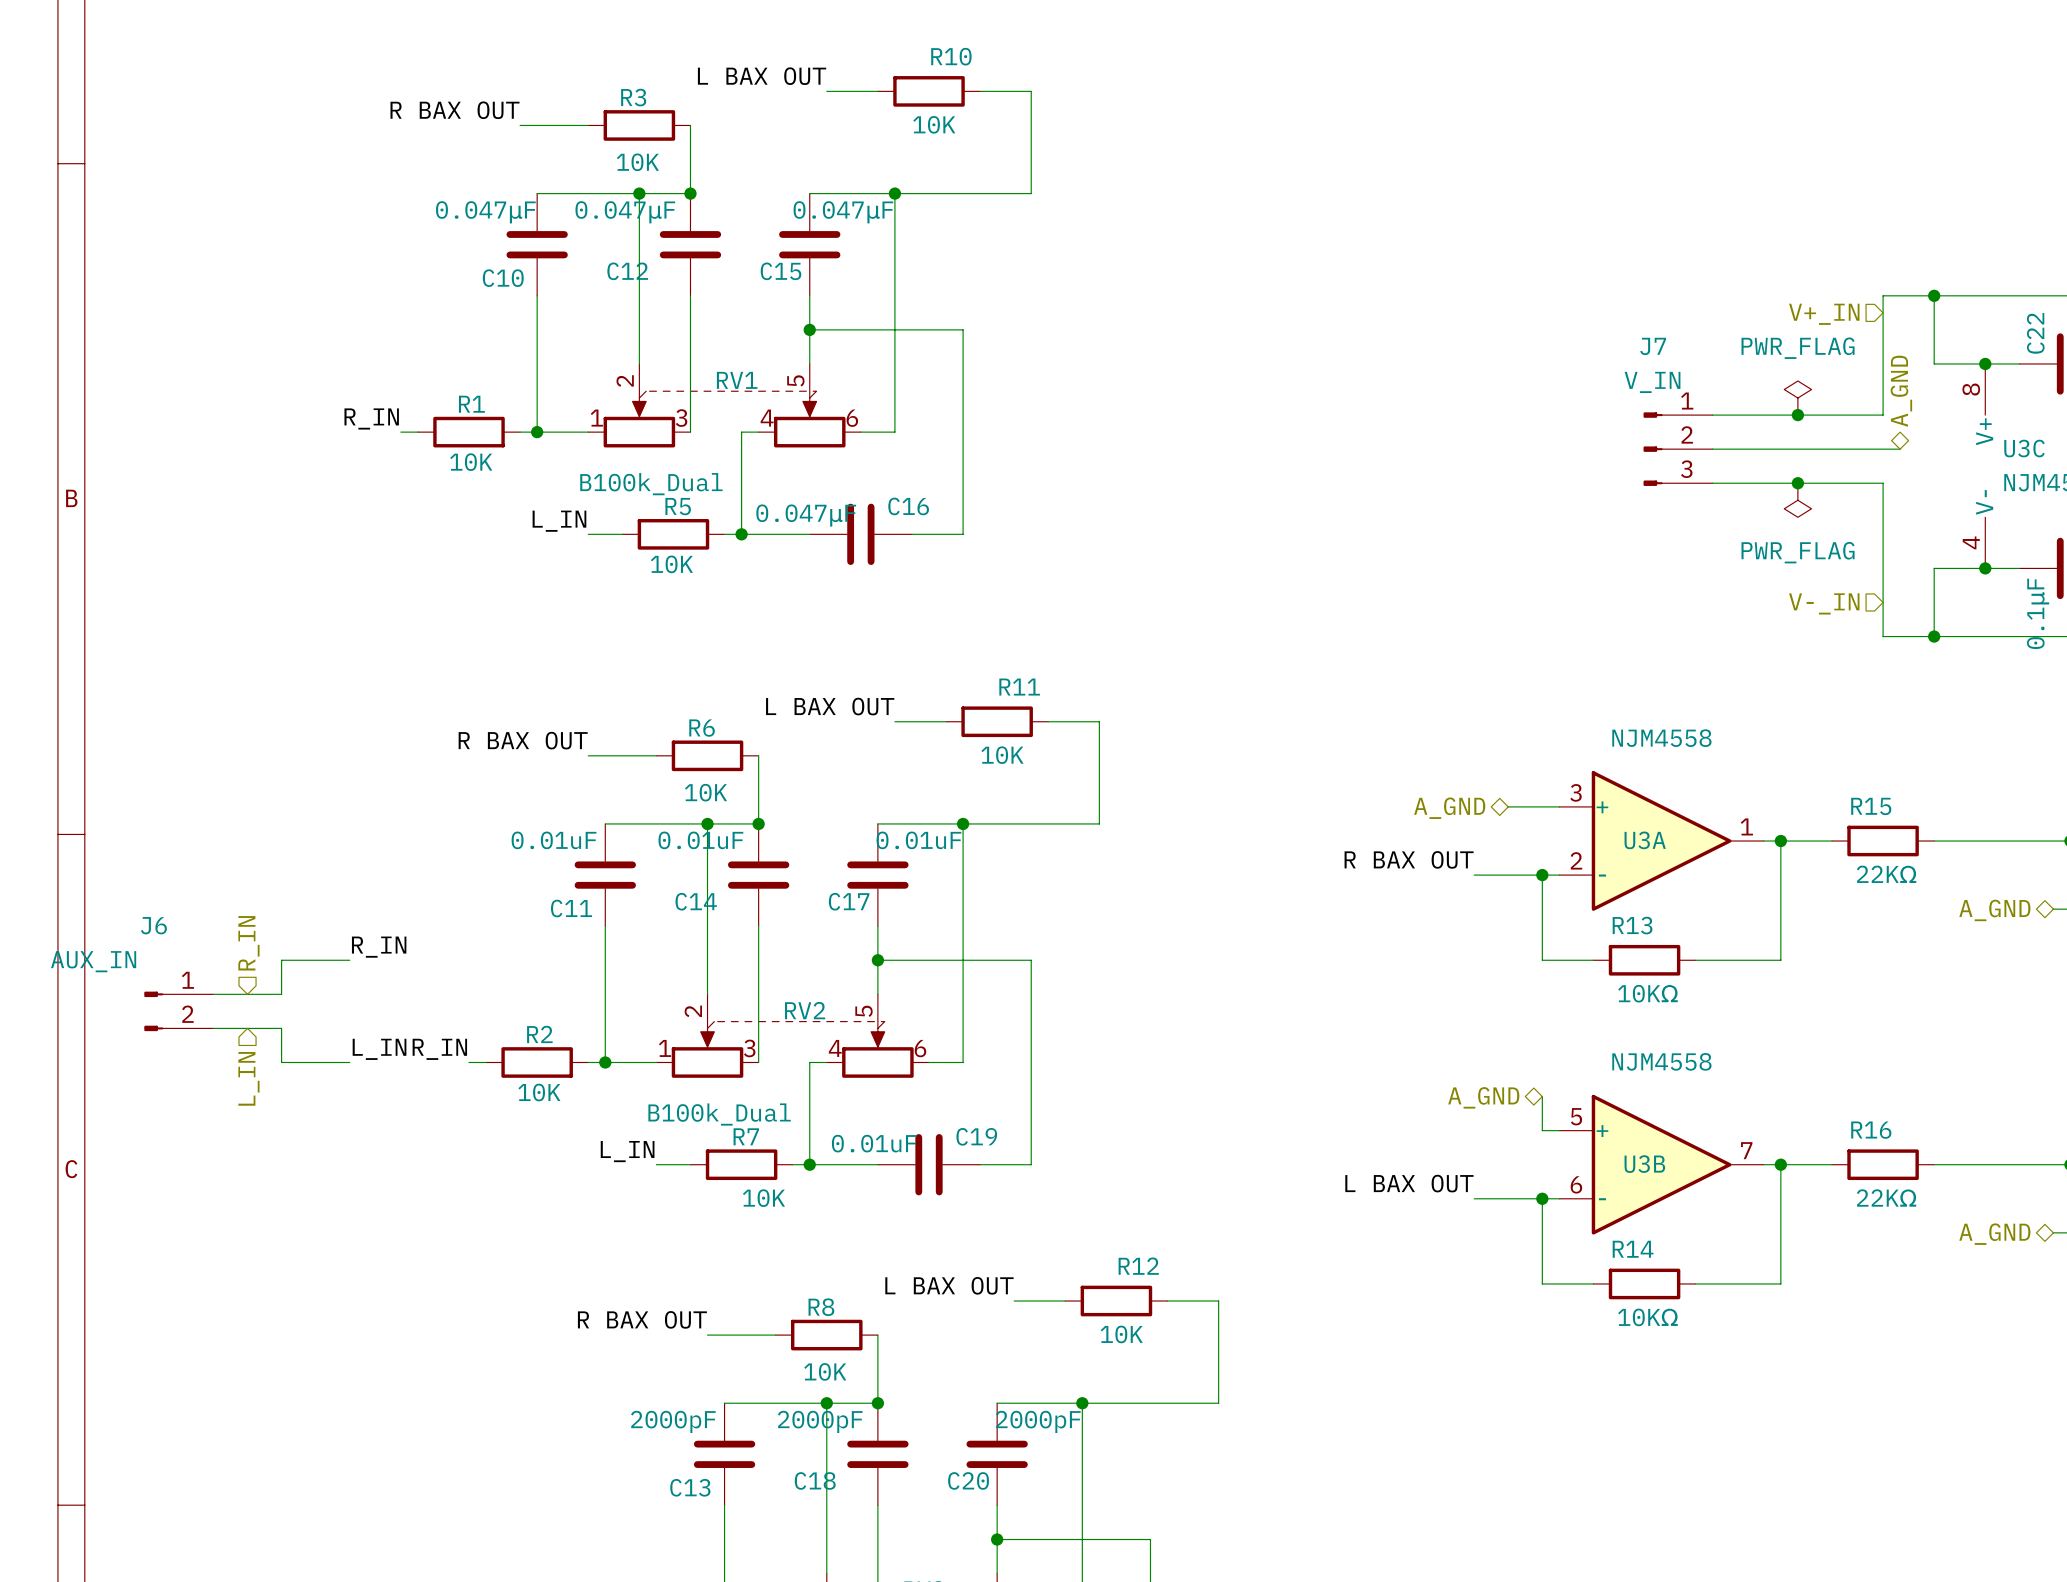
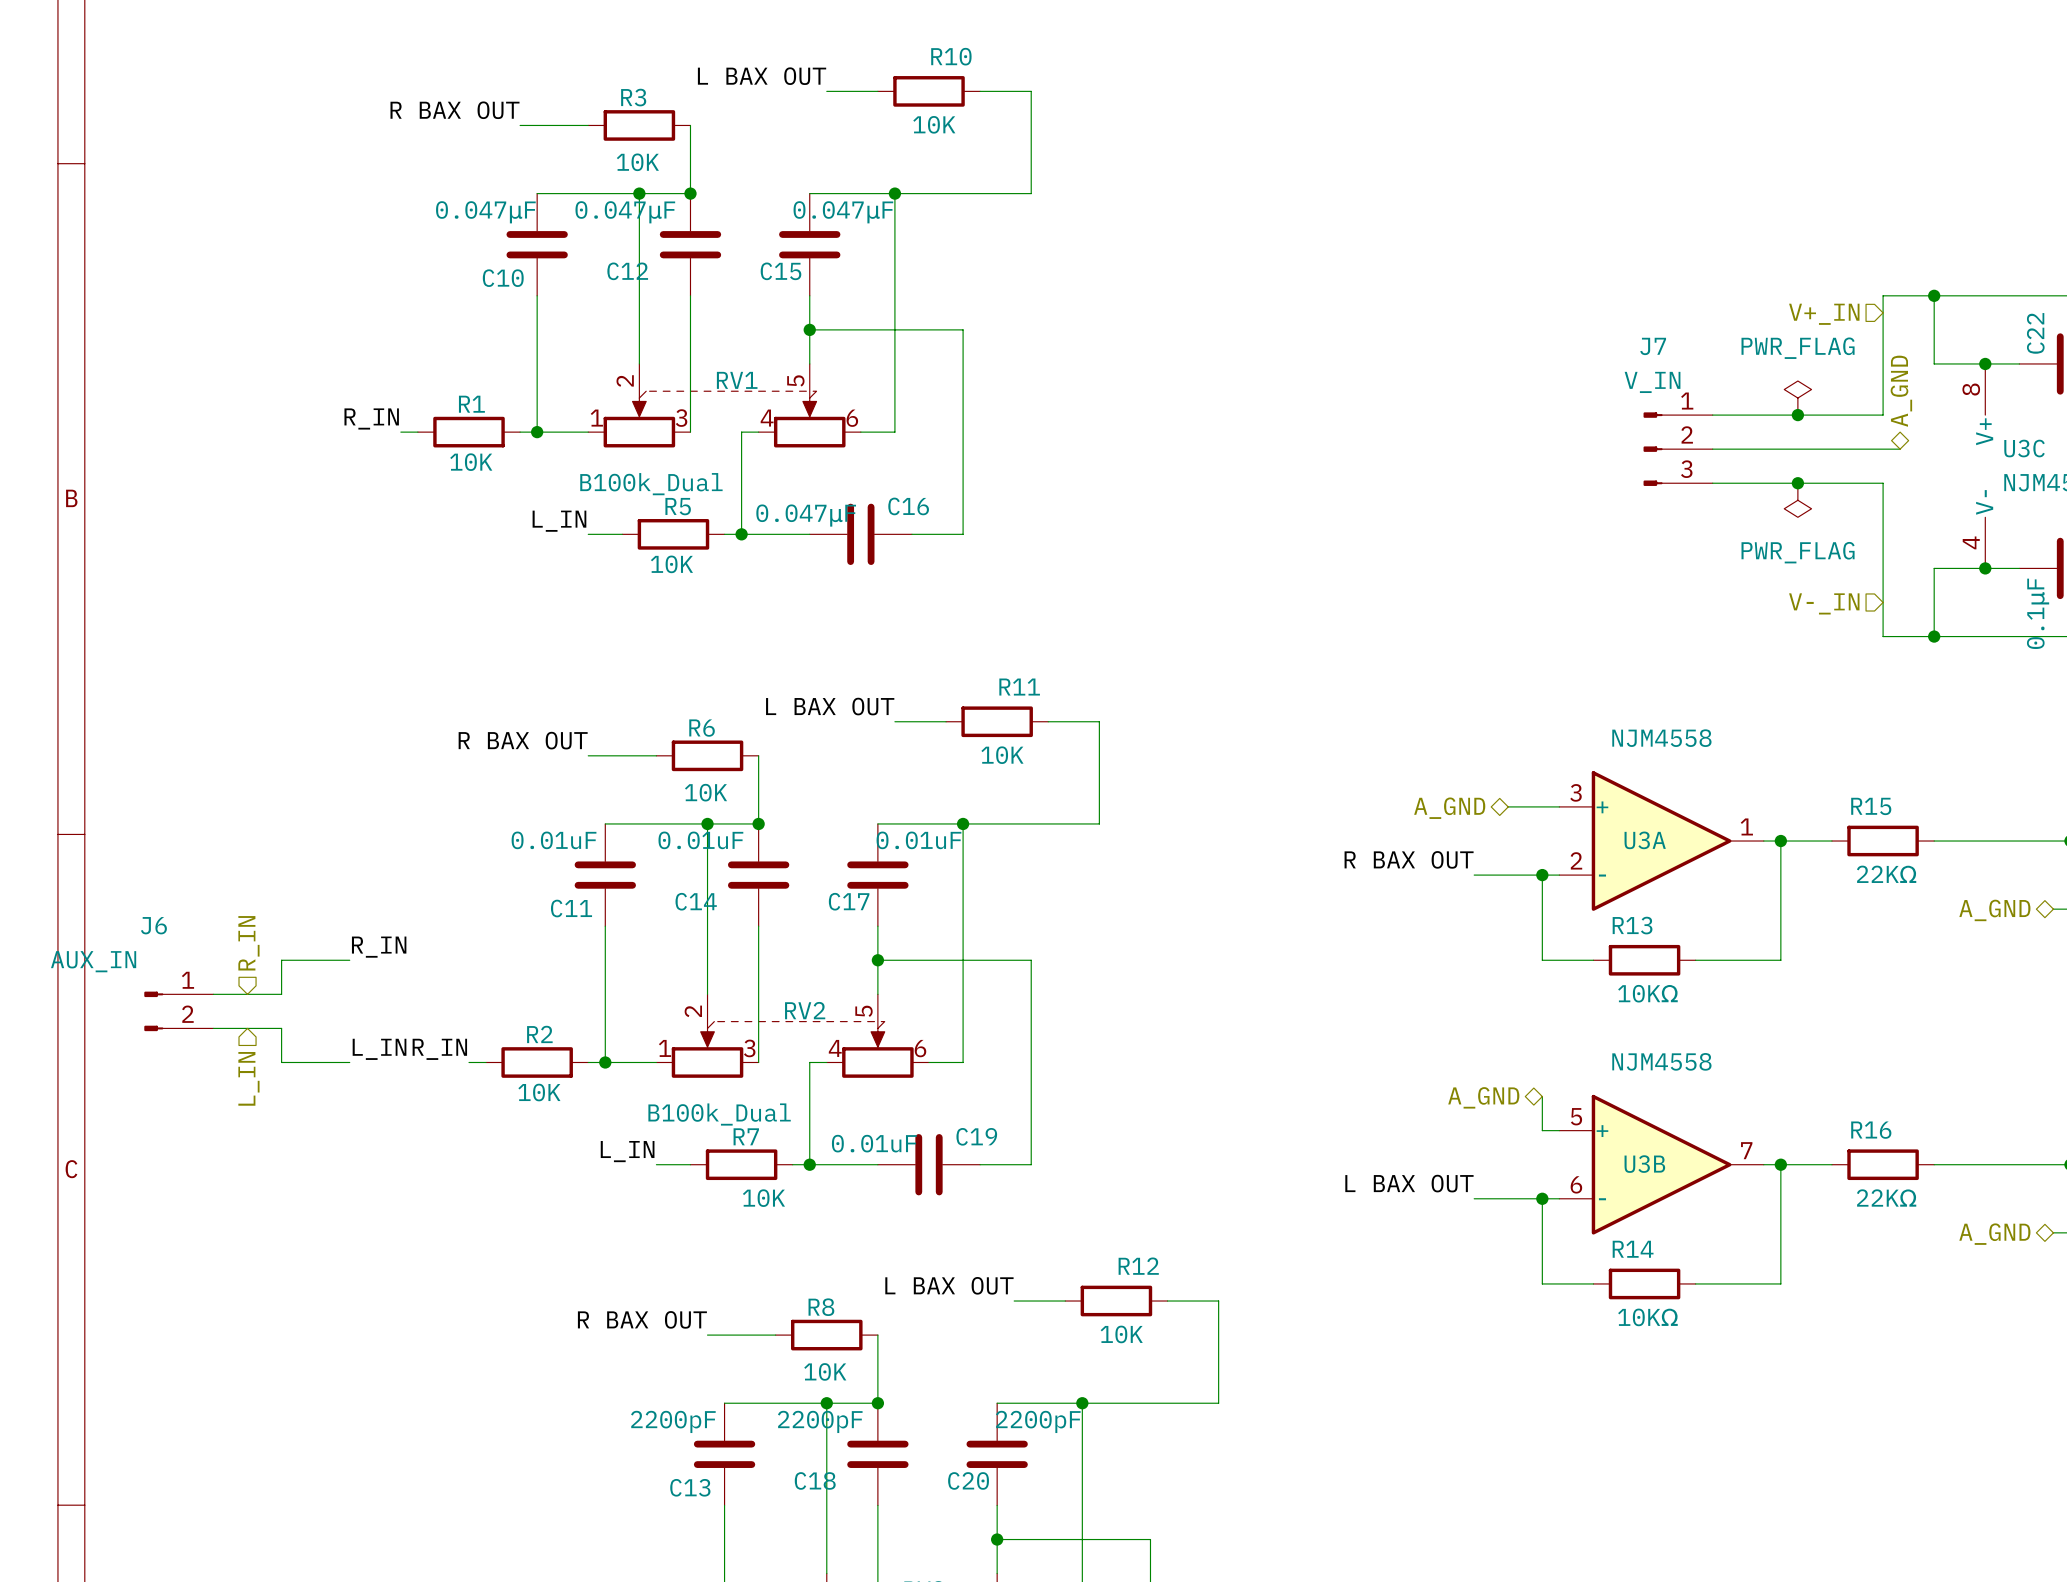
C13 value: 2000pF (673, 1421) -> 2200pF (673, 1421)
C18 value: 2000pF (820, 1421) -> 2200pF (820, 1421)
C20 value: 2000pF (1038, 1421) -> 2200pF (1038, 1421)

